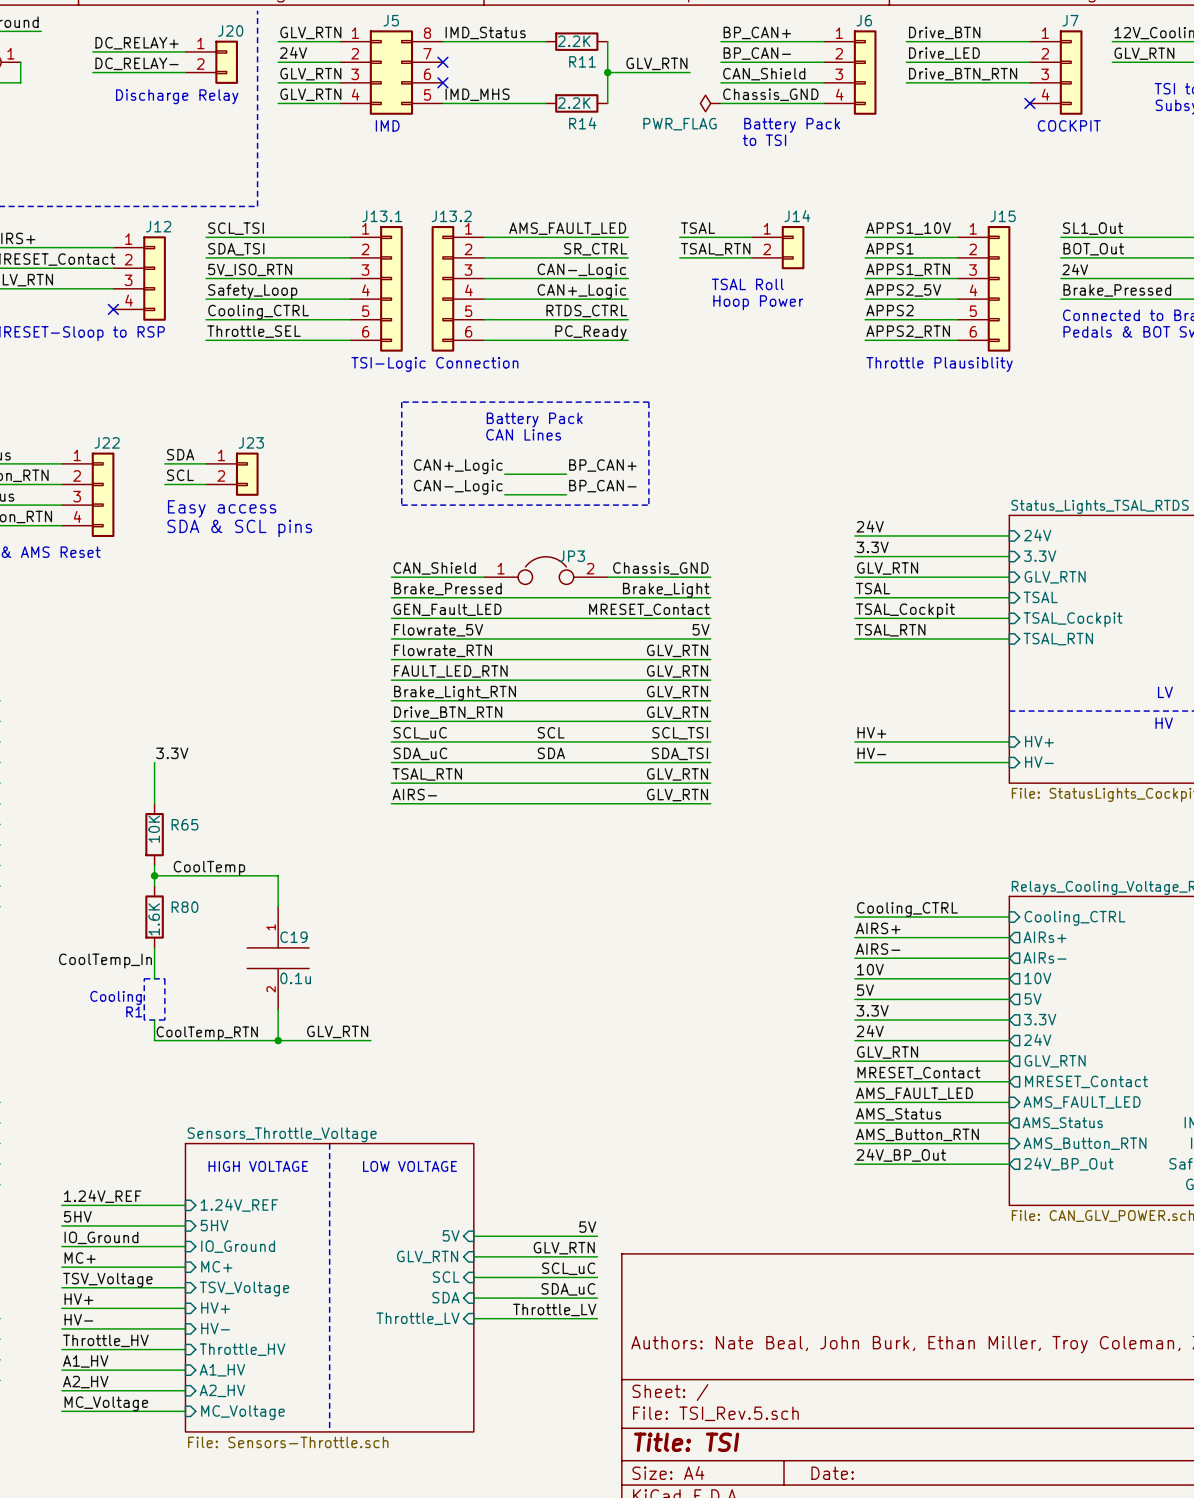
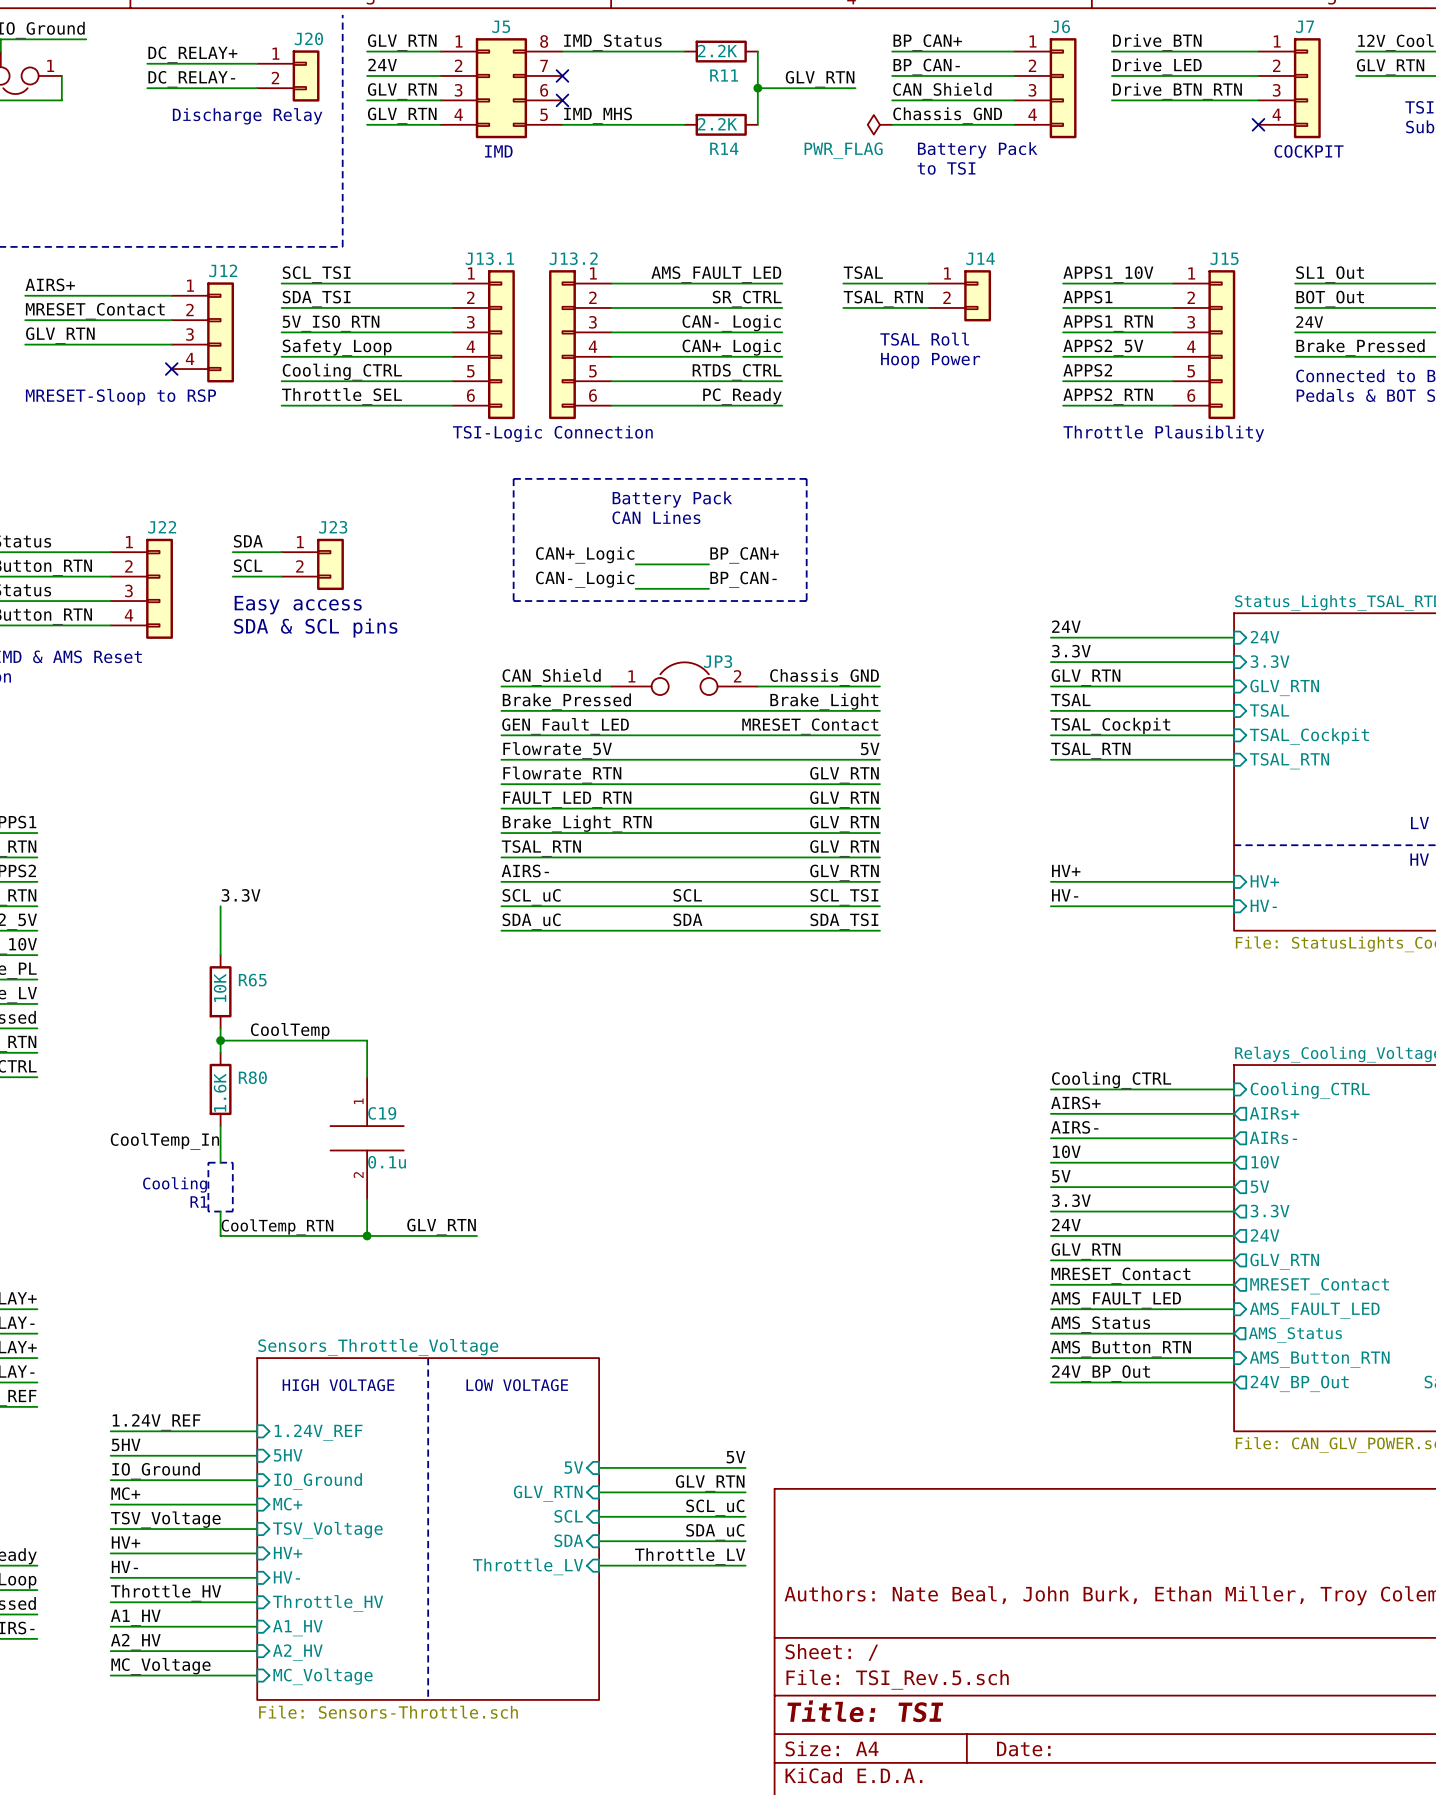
label: Drive_BTN_RTN (448, 712) -> TSAL_RTN (541, 848)
label: SCL (551, 732) -> none
label: SCL_uC (420, 733) -> AIRS- (525, 870)
label: SCL_TSI (680, 733) -> GLV_RTN (844, 872)
label: SDA_uC (420, 753) -> SCL_uC (531, 897)
label: SDA (551, 753) -> SCL (687, 895)
label: SDA_TSI (679, 753) -> SCL_TSI (844, 897)
label: none -> SDA (687, 919)
label: TSAL_RTN (427, 774) -> SDA_uC (531, 921)
label: GLV_RTN (677, 774) -> SDA_TSI (844, 921)
label: AIRS- (414, 794) -> none
label: GLV_RTN (677, 795) -> none
wire: (391, 803) (710, 803) -> none

